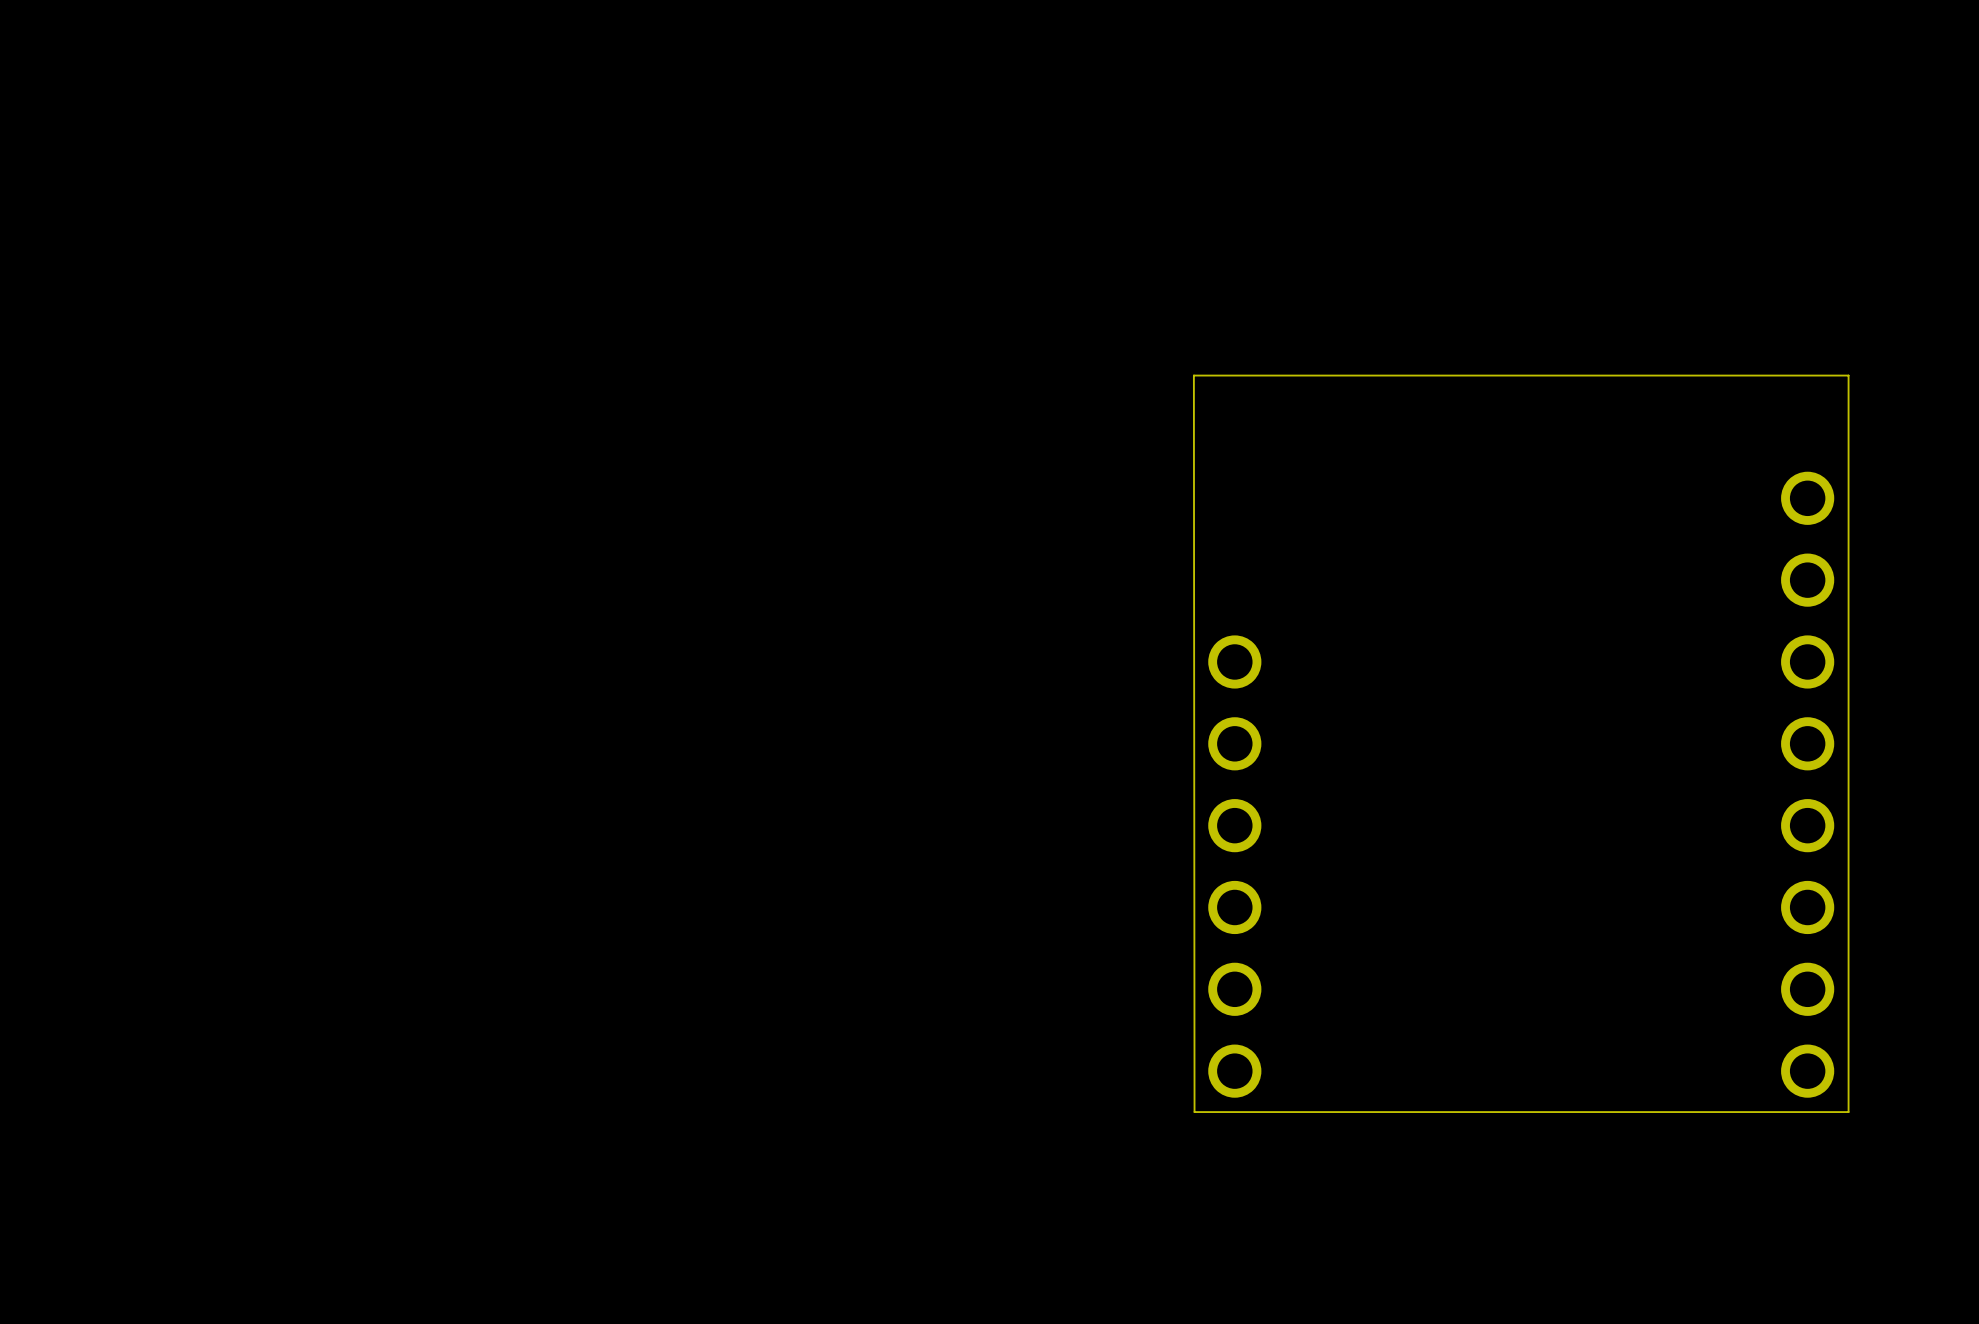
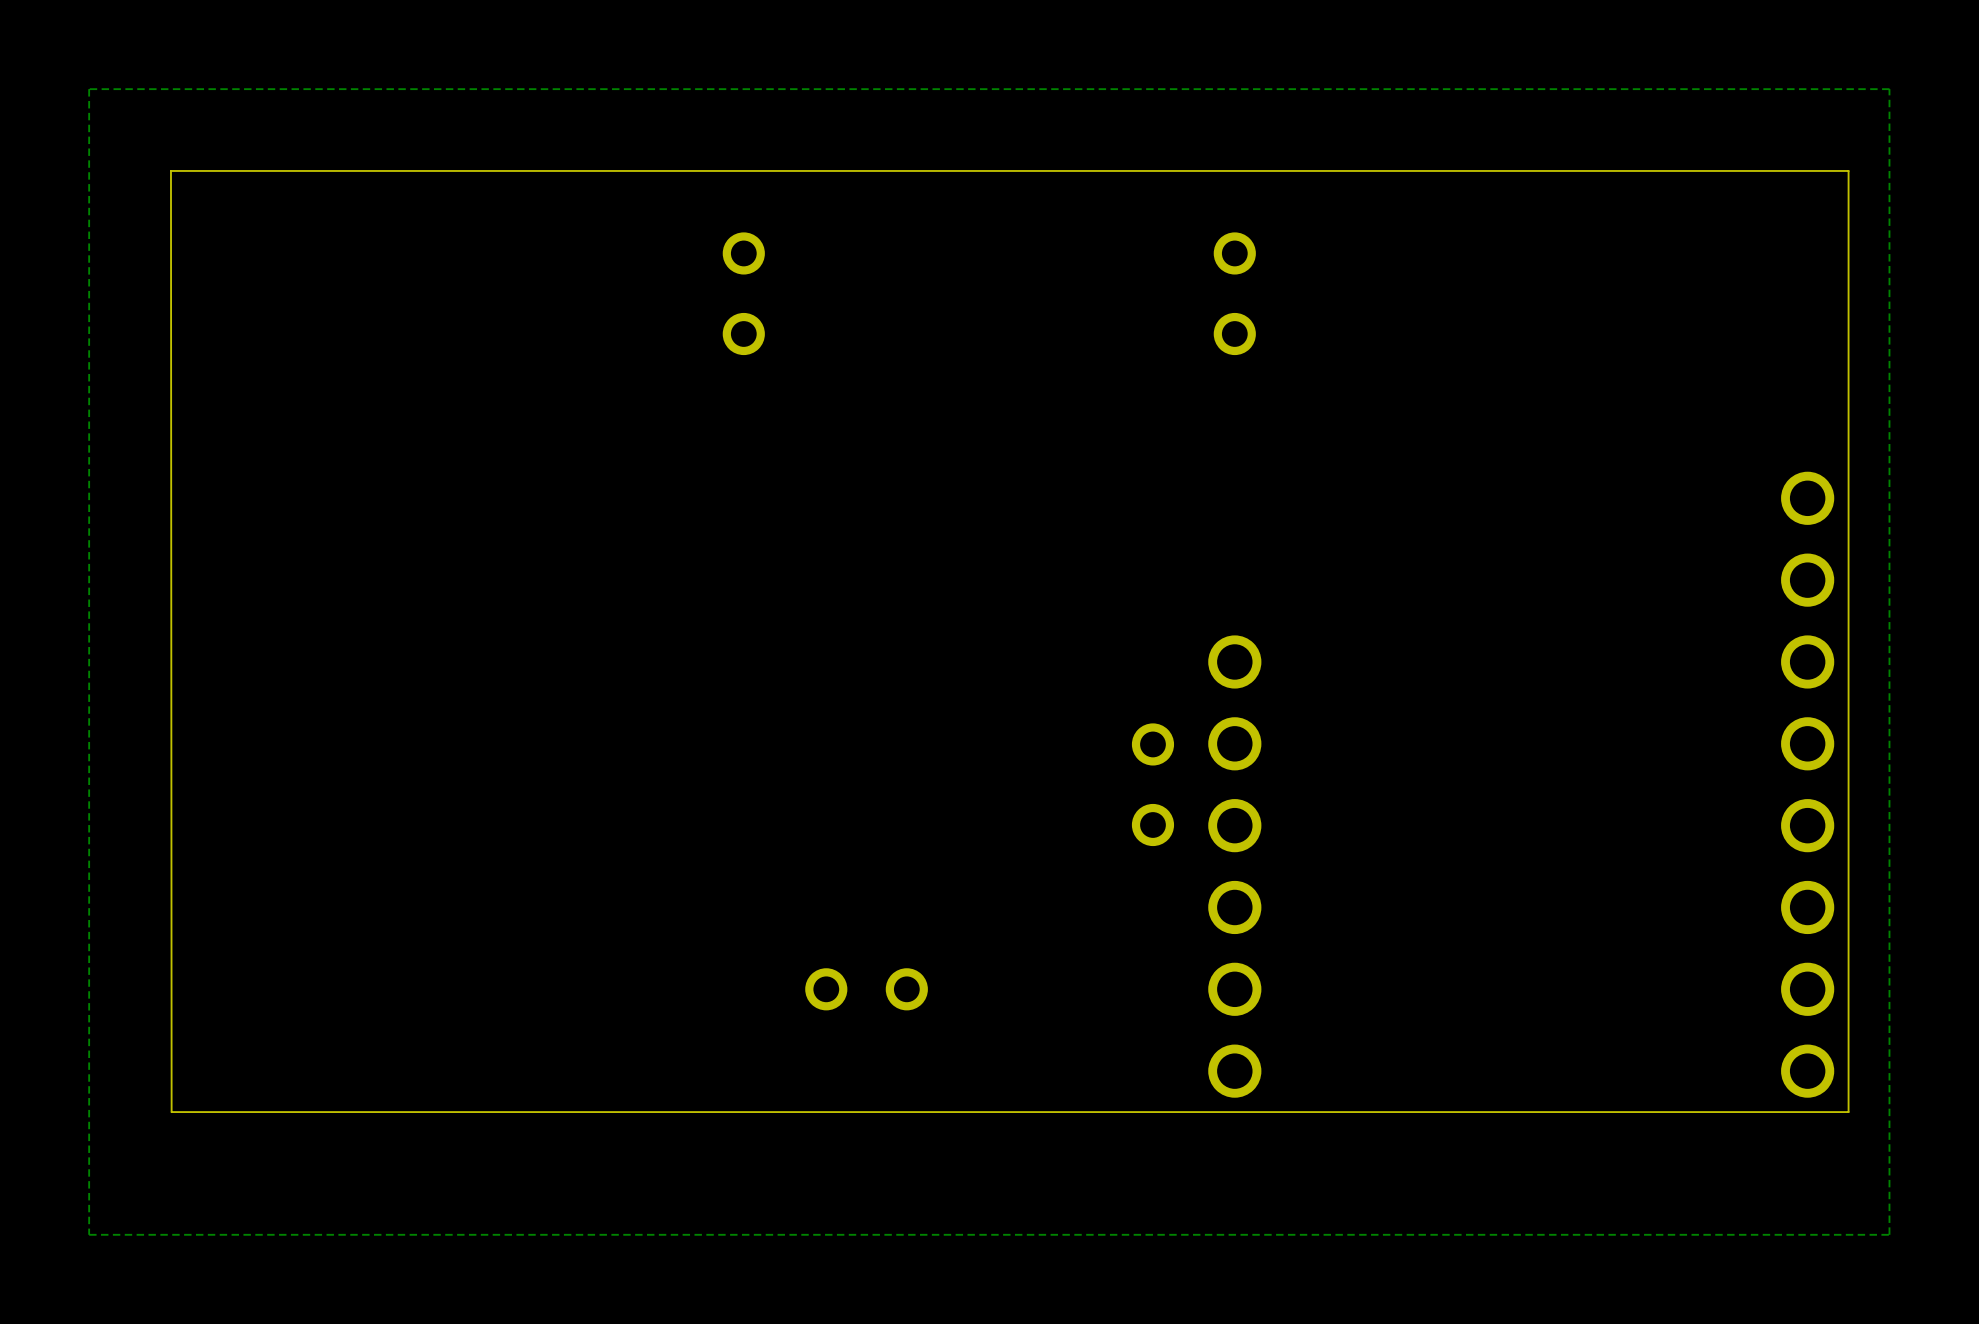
zone outline: none -> (1889, 89) (89, 89) (89, 1234) (1889, 1234) (1889, 89)
part: none -> (743, 293)
part: none -> (1234, 293)
board edge: (1848, 375) (1193, 375) (1194, 1112) -> (1848, 375) (1848, 170) (170, 170) (171, 1112) (1194, 1112)
part: none -> (1152, 784)
part: none -> (866, 989)

